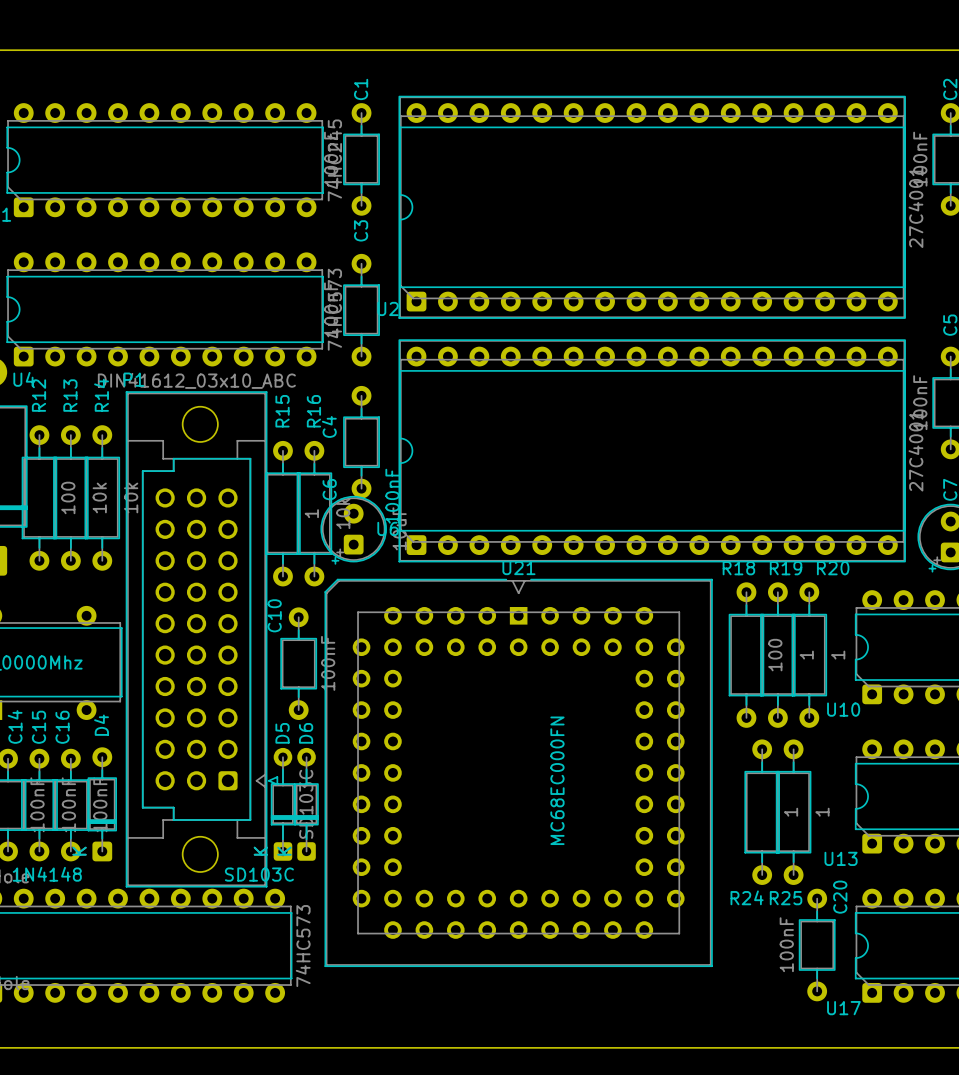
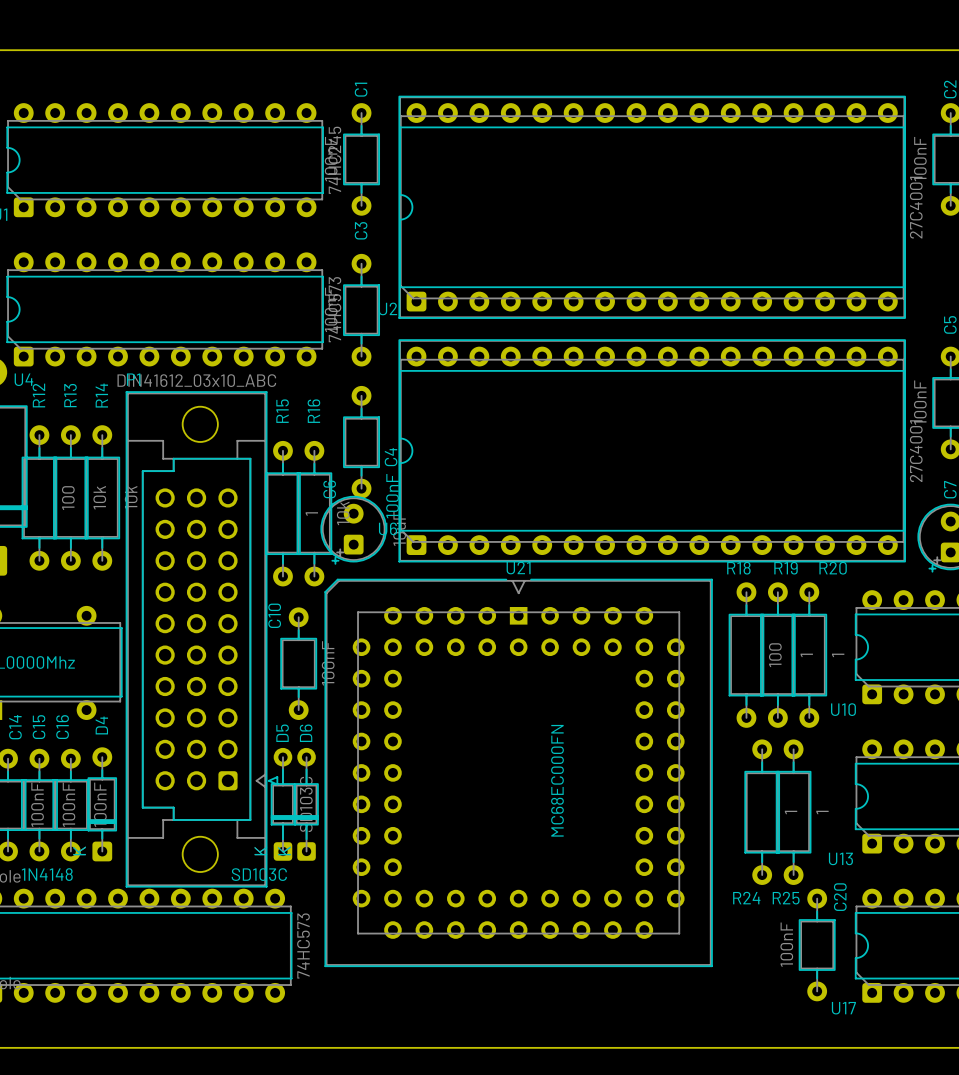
C4 name position: C4 (329, 426) -> C4 (391, 457)

